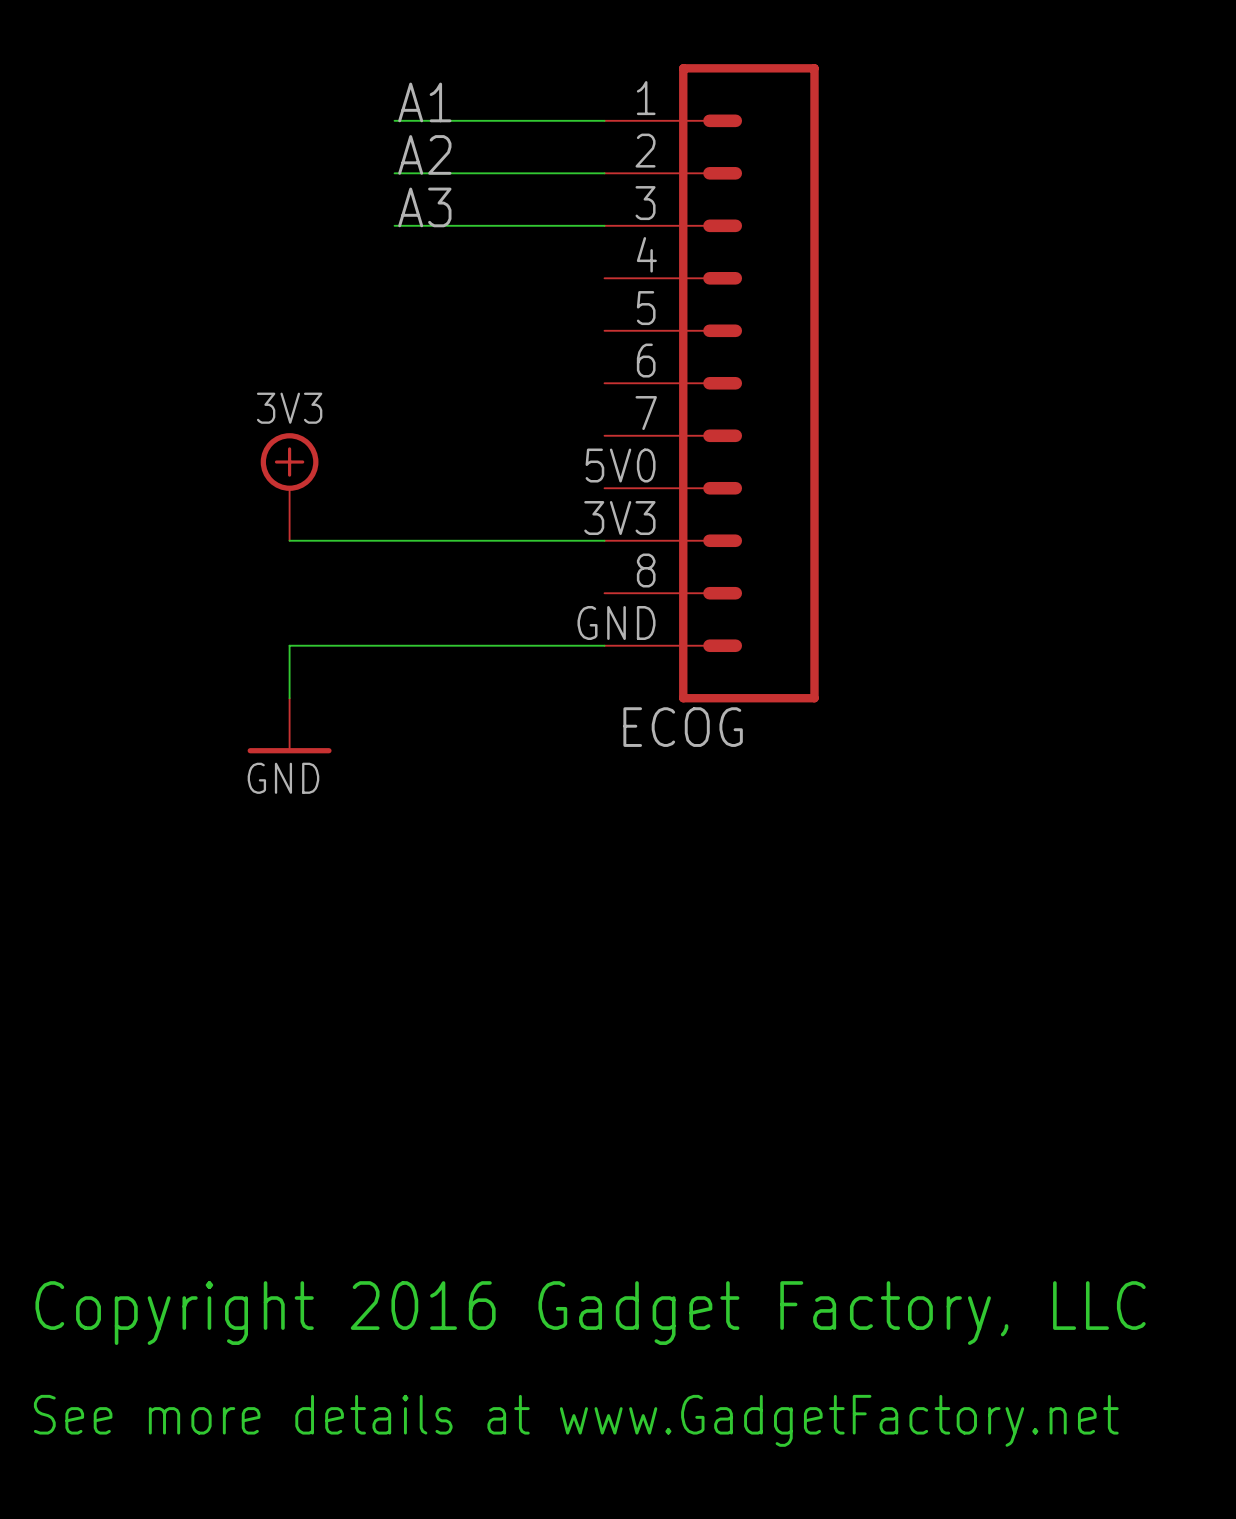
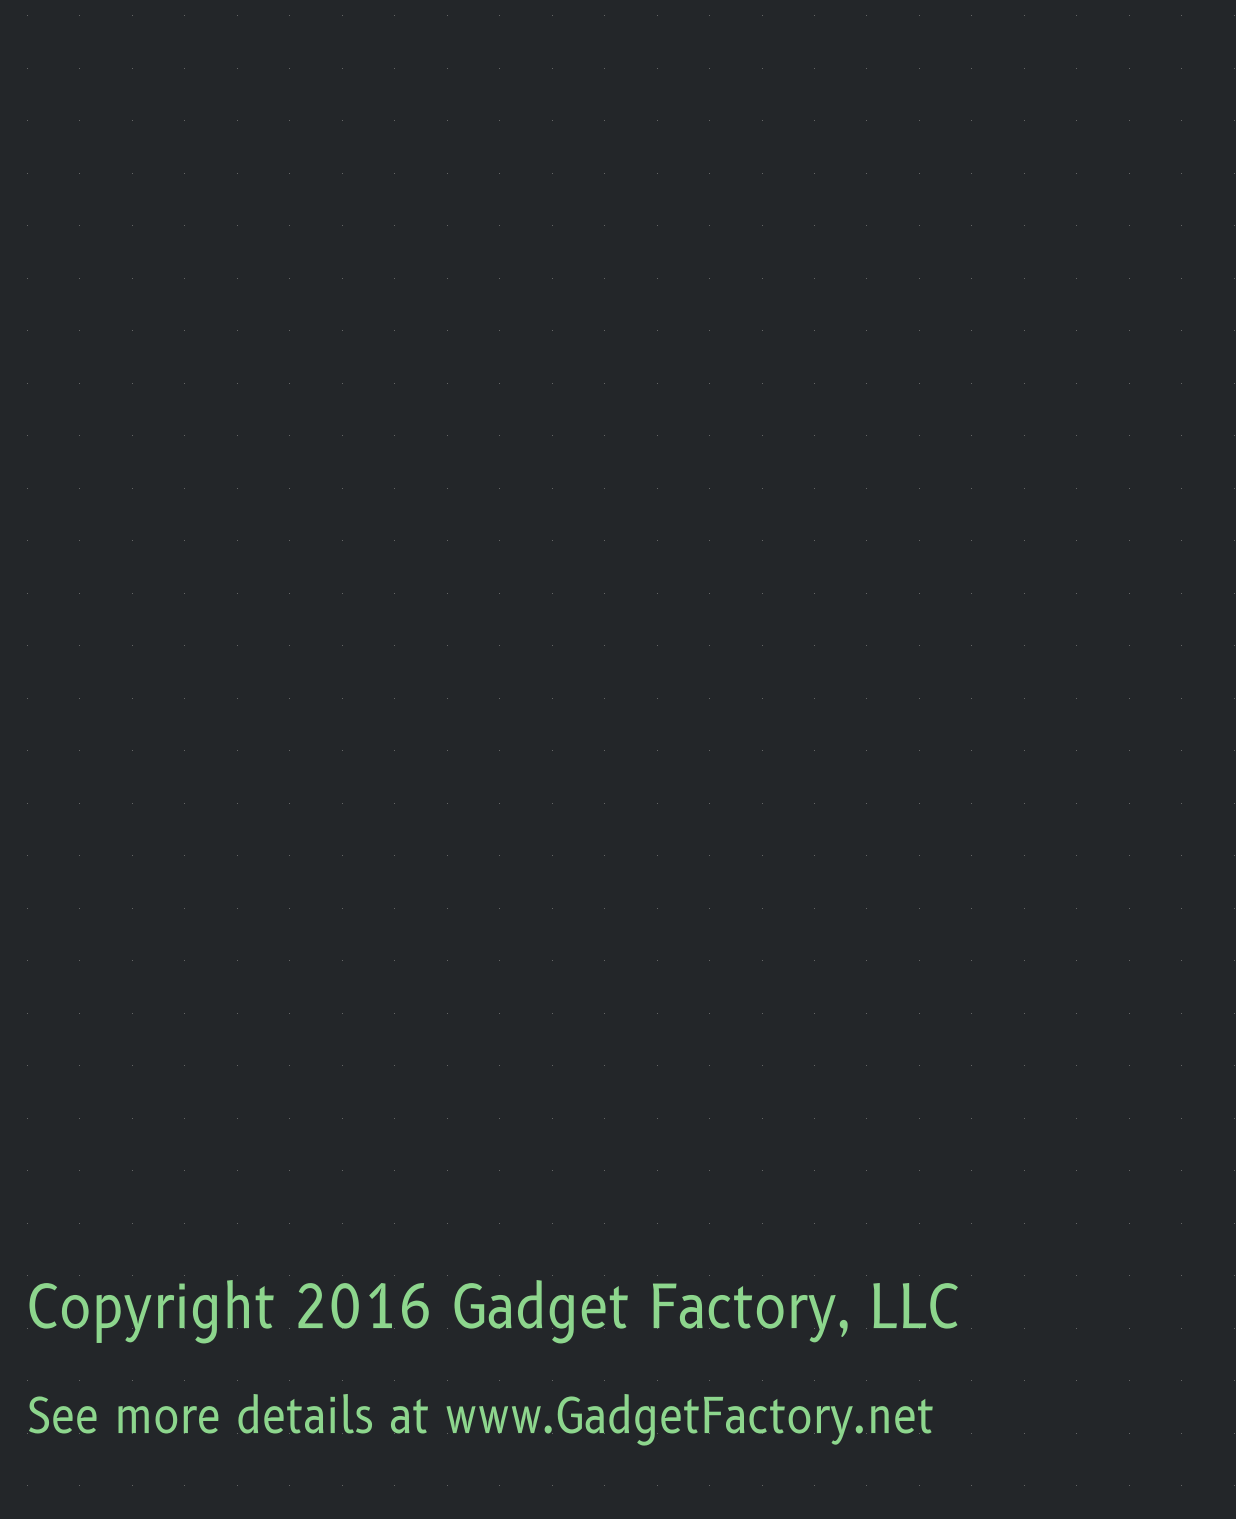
label: A1 (424, 102) -> none
wire: (394, 120) (604, 120) -> none
label: A2 (424, 154) -> none
wire: (394, 173) (604, 173) -> none
label: A3 (424, 207) -> none
wire: (394, 225) (604, 225) -> none
ECOG: (711, 383) -> none
power symbol: 3V3 (289, 486) -> none
wire: (289, 540) (604, 540) -> none
wire: (604, 645) (289, 645) (289, 698) -> none
power symbol: GND (289, 725) -> none

